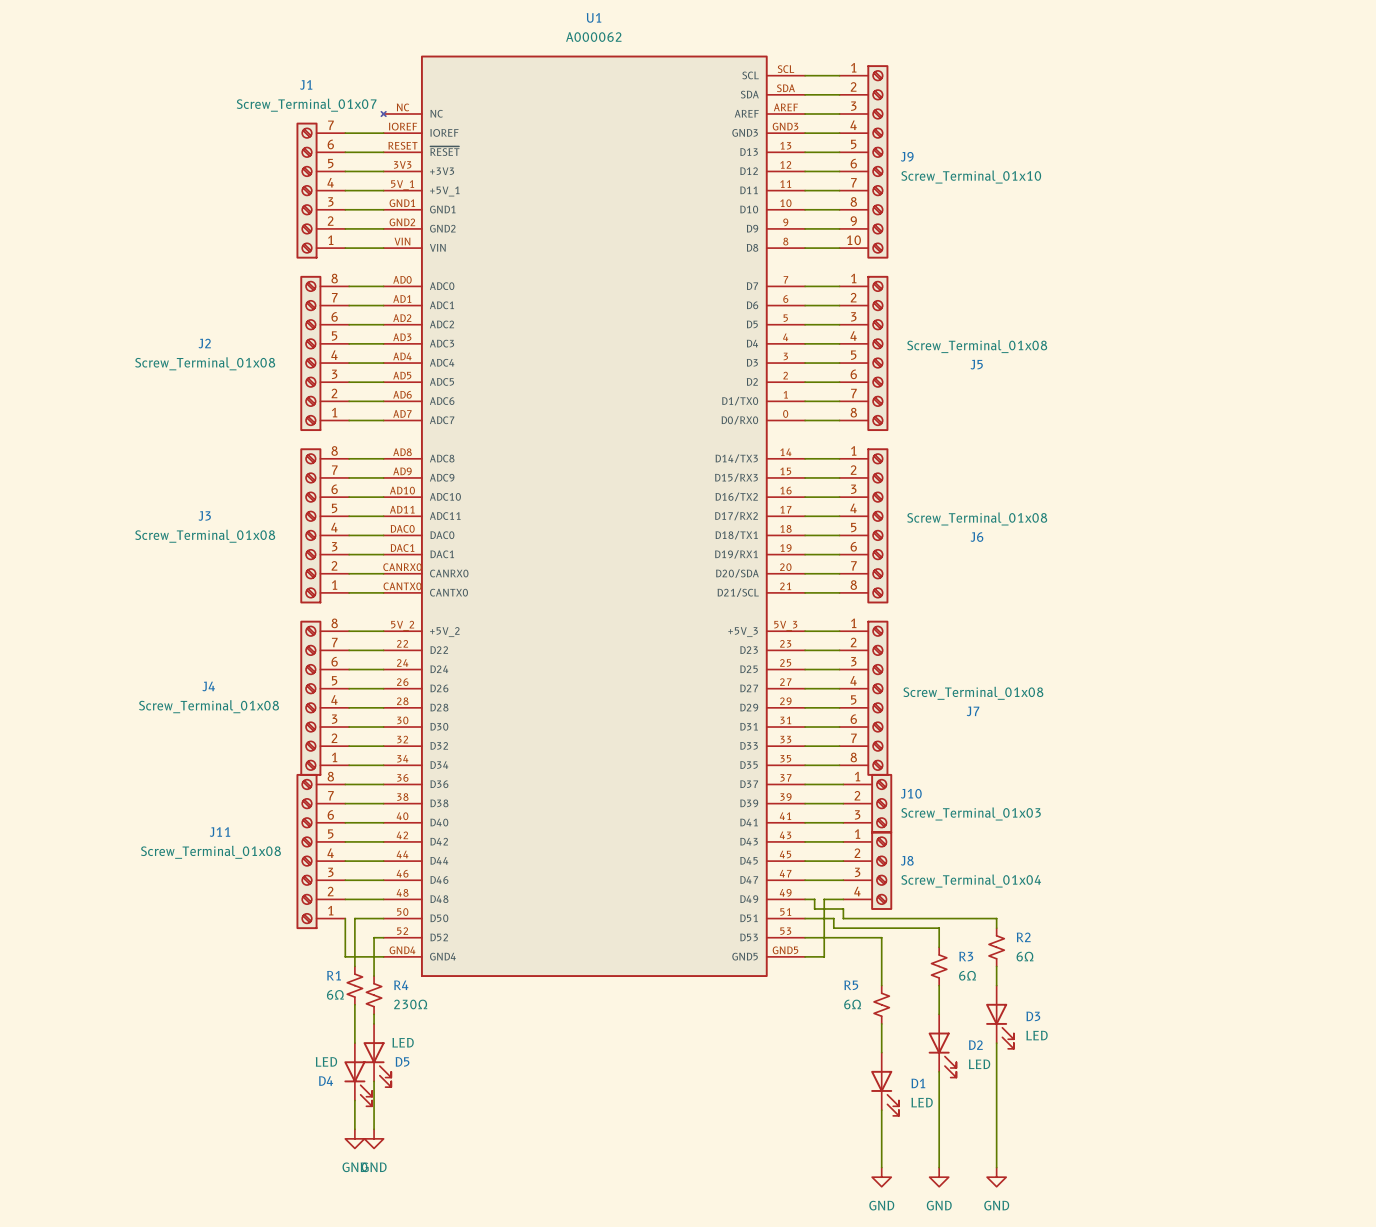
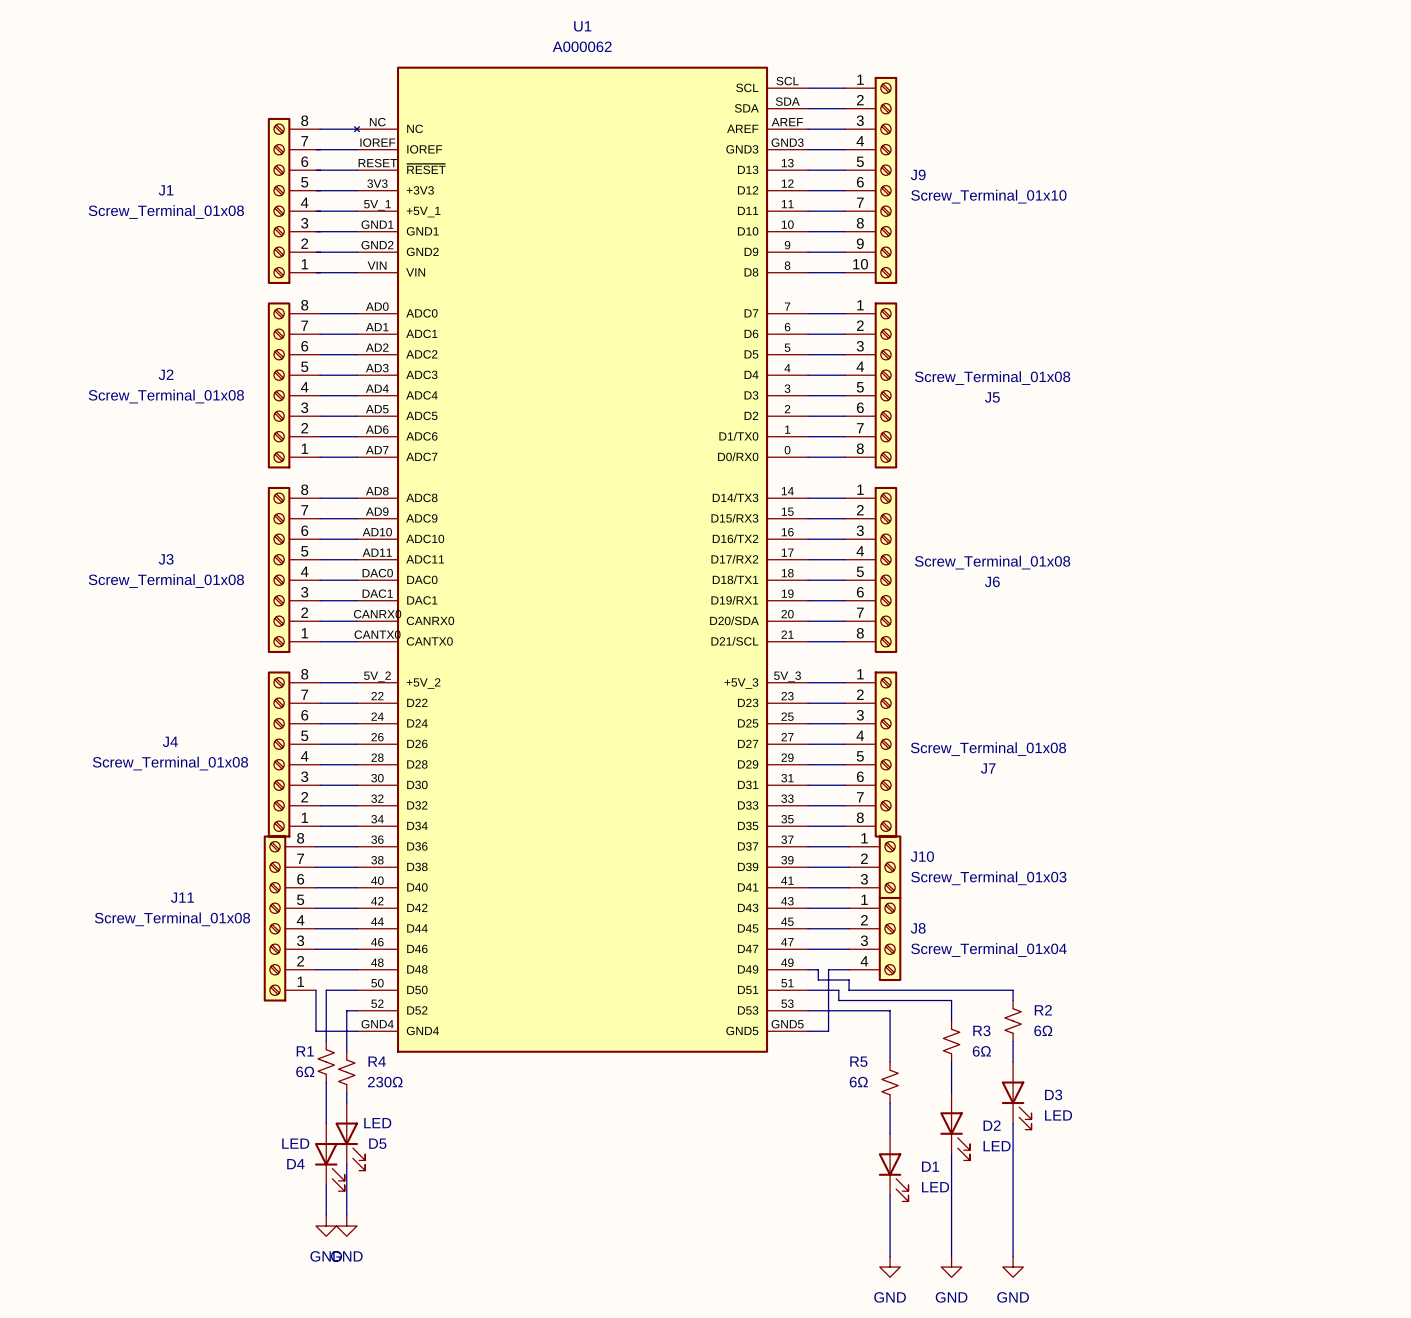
J1 name position: J1 (306, 84) -> J1 (166, 190)
J1 value: Screw_Terminal_01x07 (306, 105) -> Screw_Terminal_01x08 (166, 212)
wire: none -> (320, 129) (357, 129)
J1 symbol: [296, 122, 346, 259] -> [267, 117, 321, 284]

